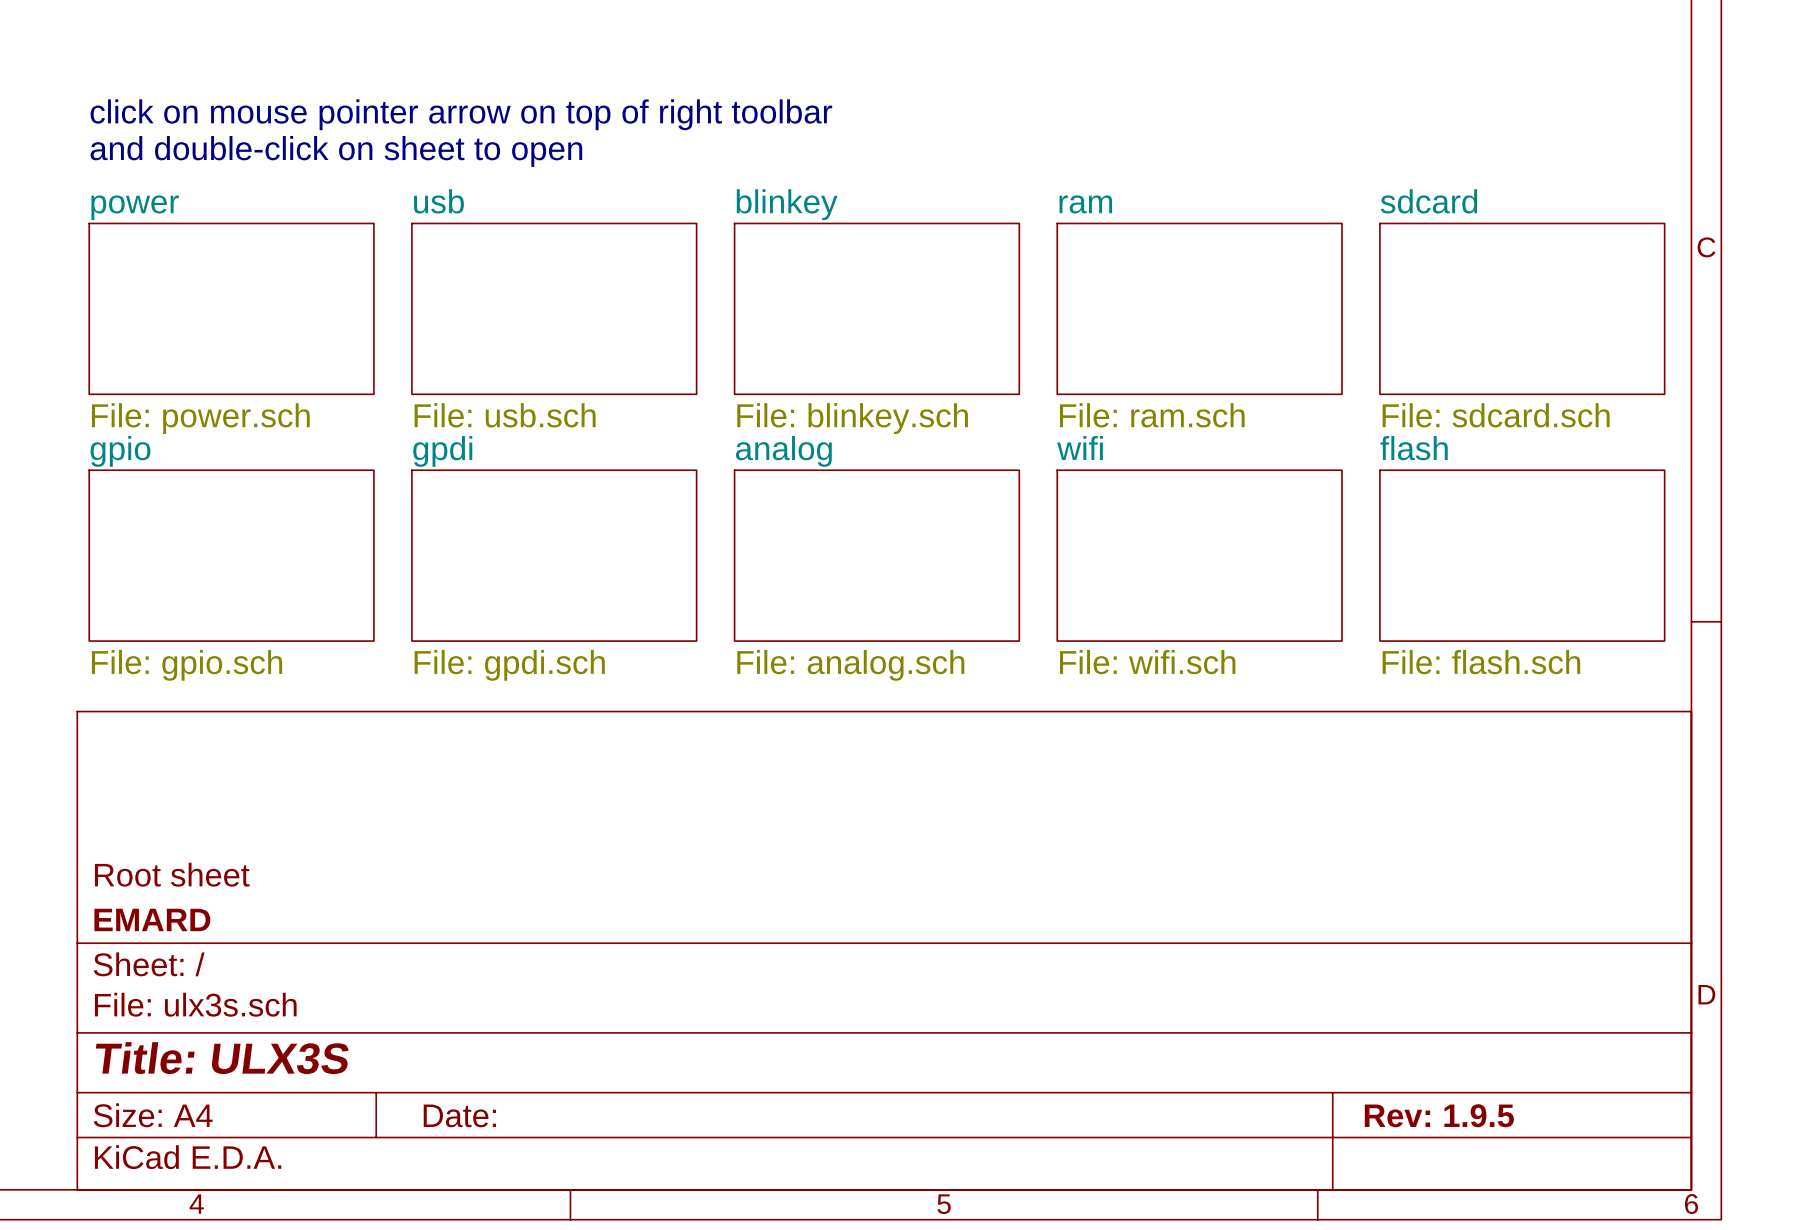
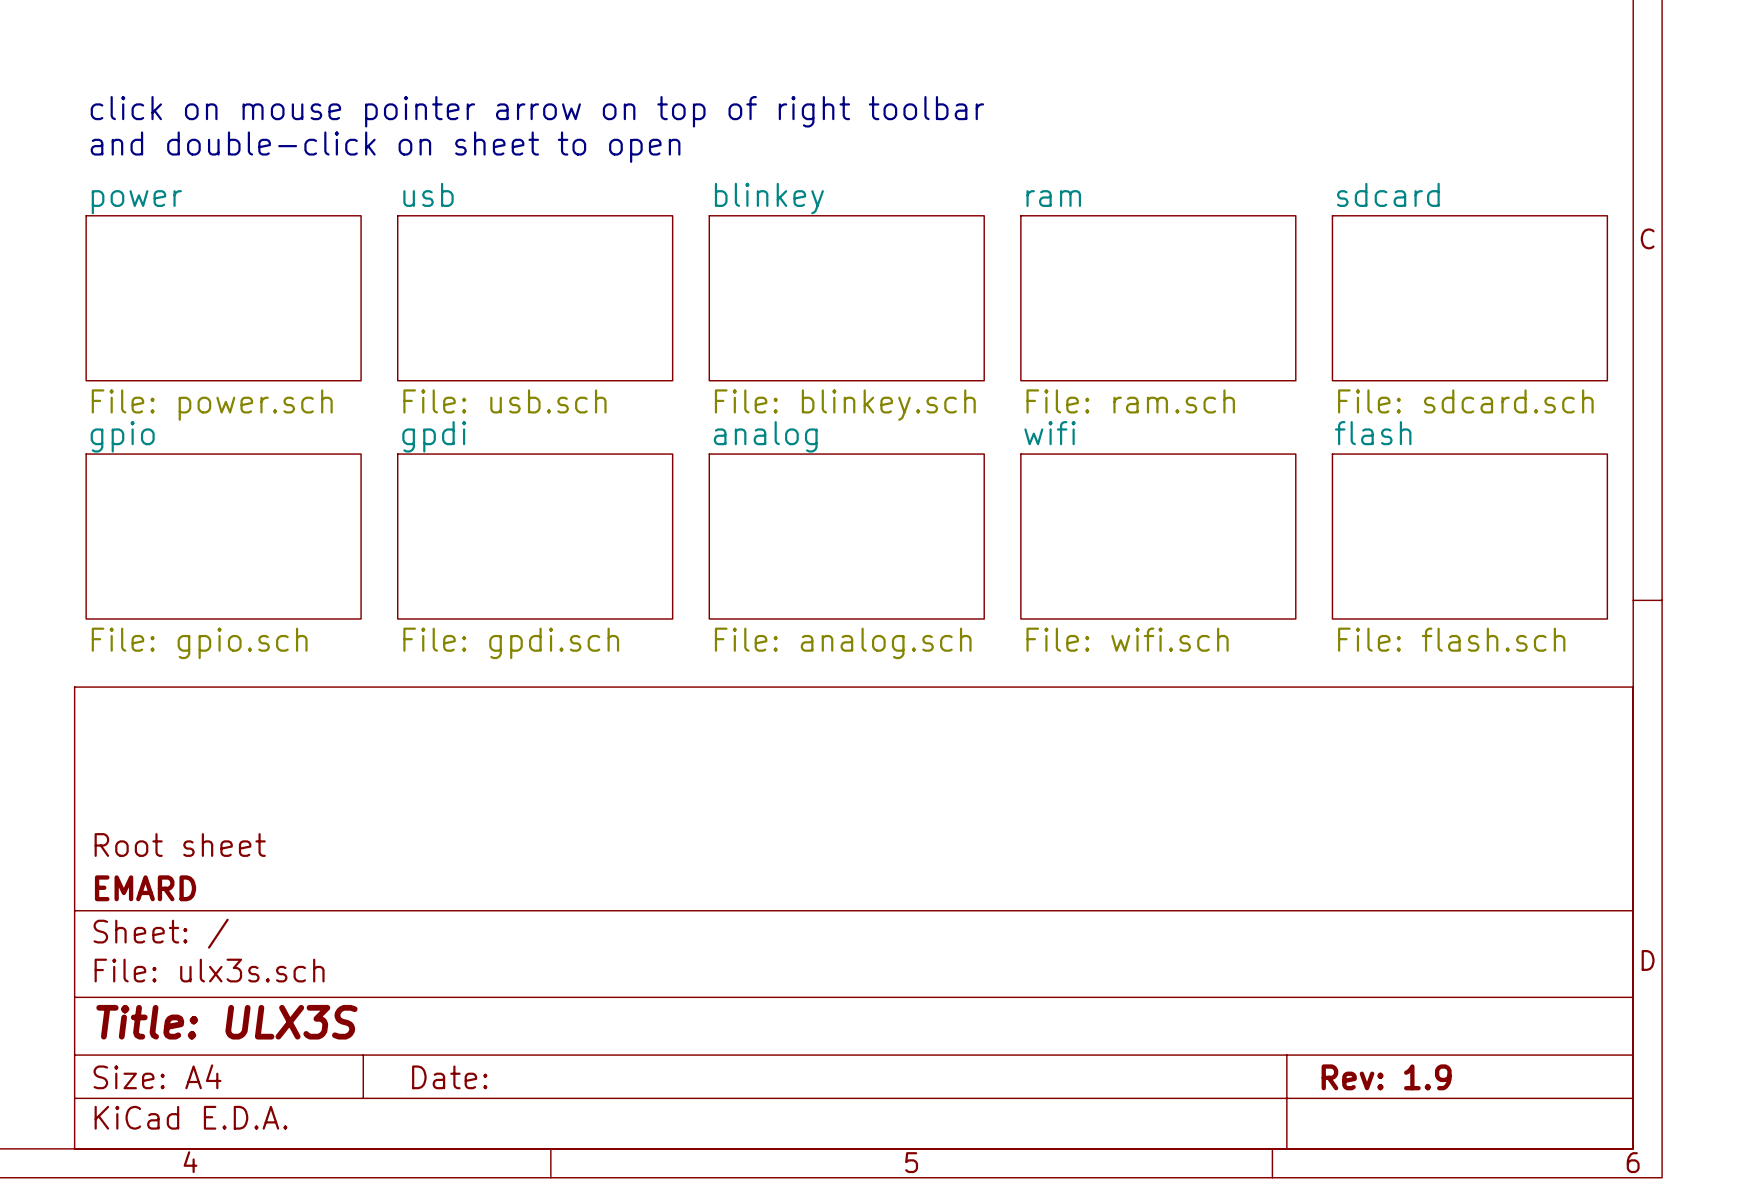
title block: Rev: 1.9.5 (1439, 1115) -> Rev: 1.9 (1386, 1077)

